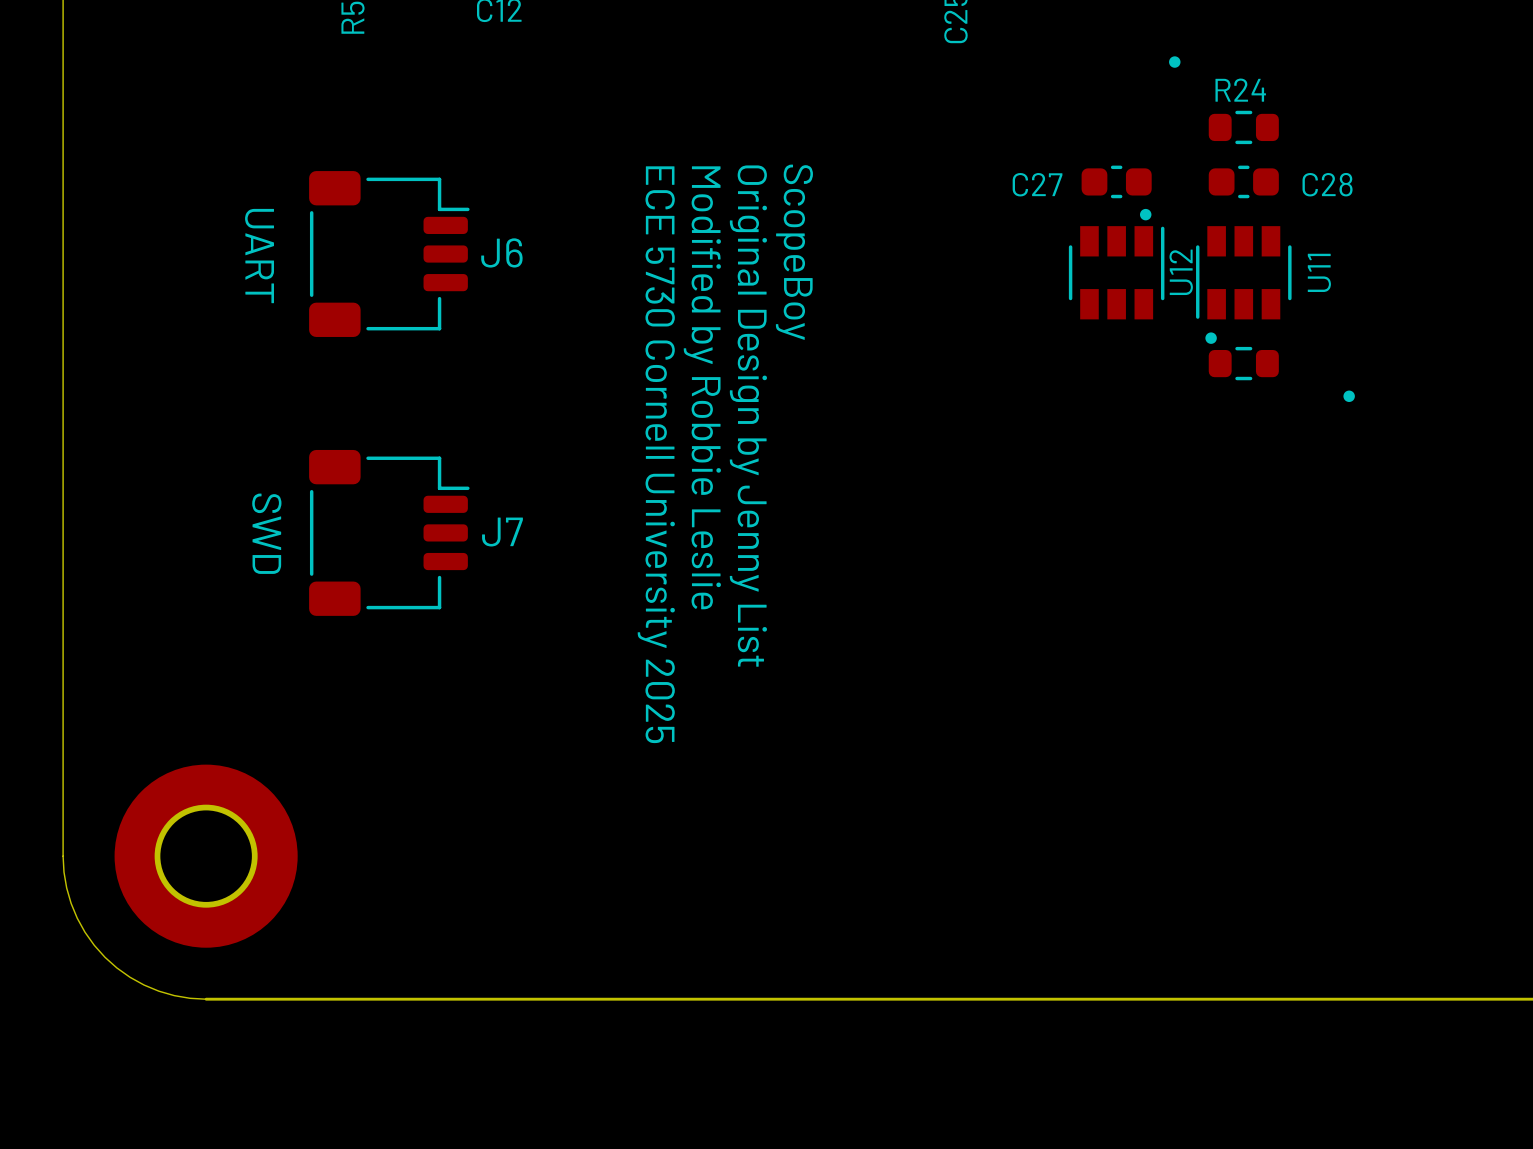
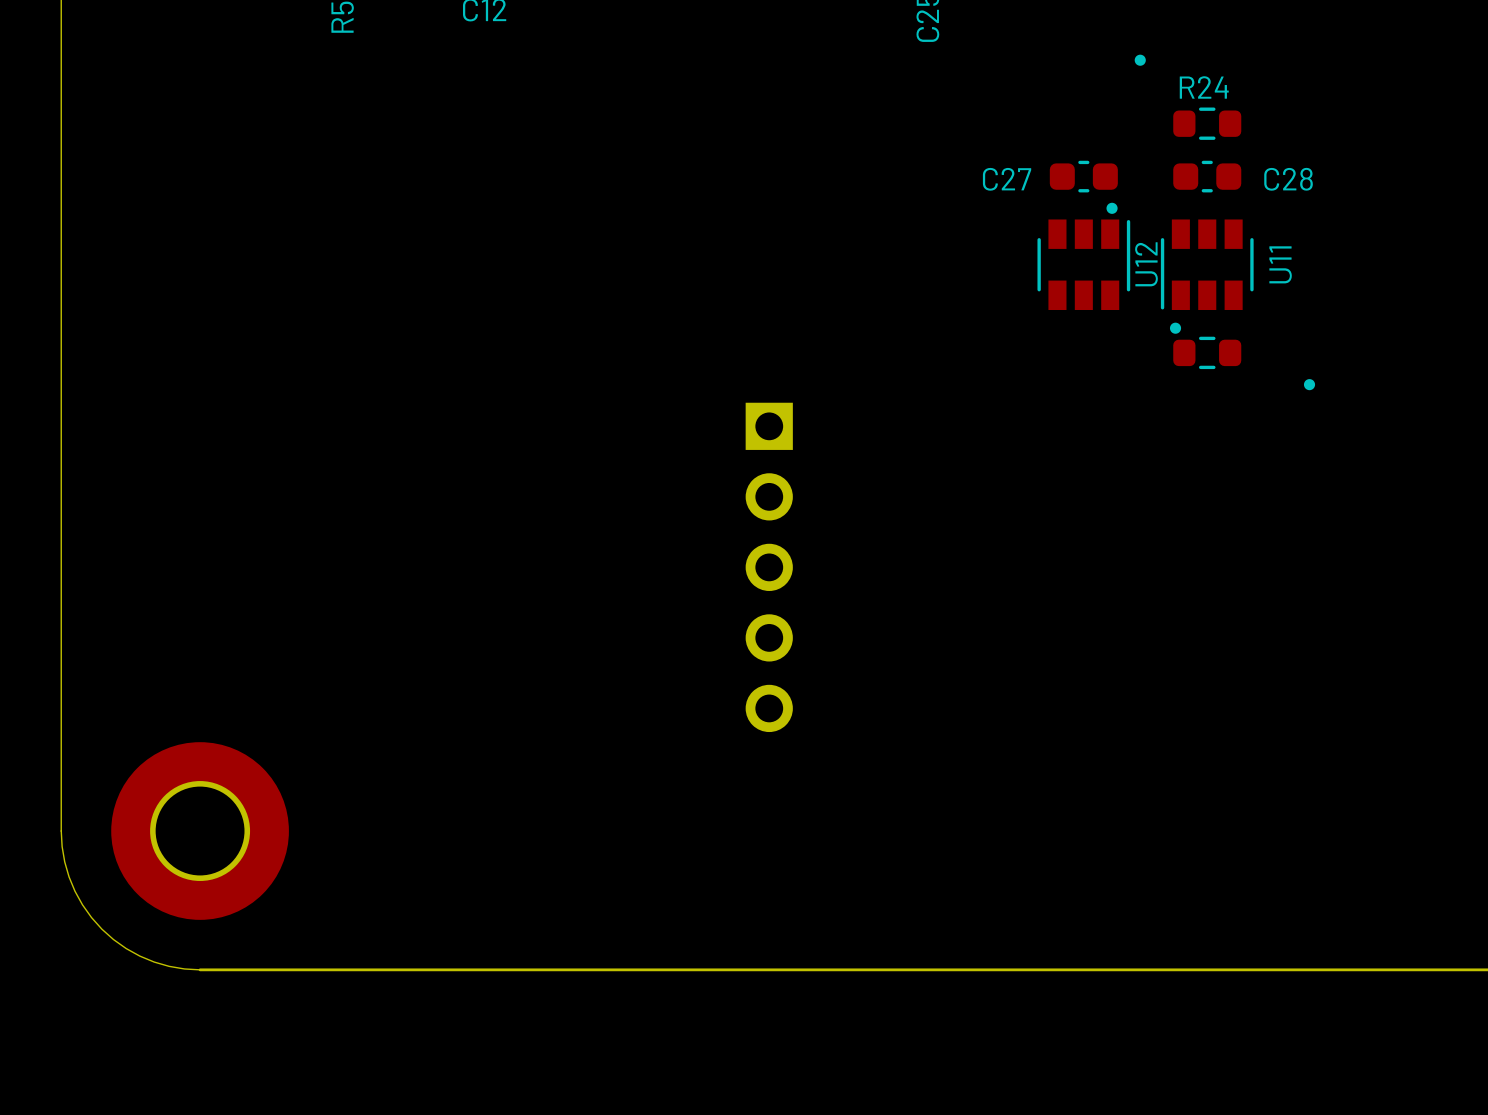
text: ScopeBoy (794, 252) -> none
J6: (389, 254) -> none
text: UART (259, 256) -> none
text: Modified by Robbie Leslie (702, 387) -> none
text: Original Design by Jenny List (748, 416) -> none
text: ECE 5730 Cornell University 2025 (656, 454) -> none
J7: (389, 532) -> none
text: SWD (266, 533) -> none
part: none -> (769, 567)

